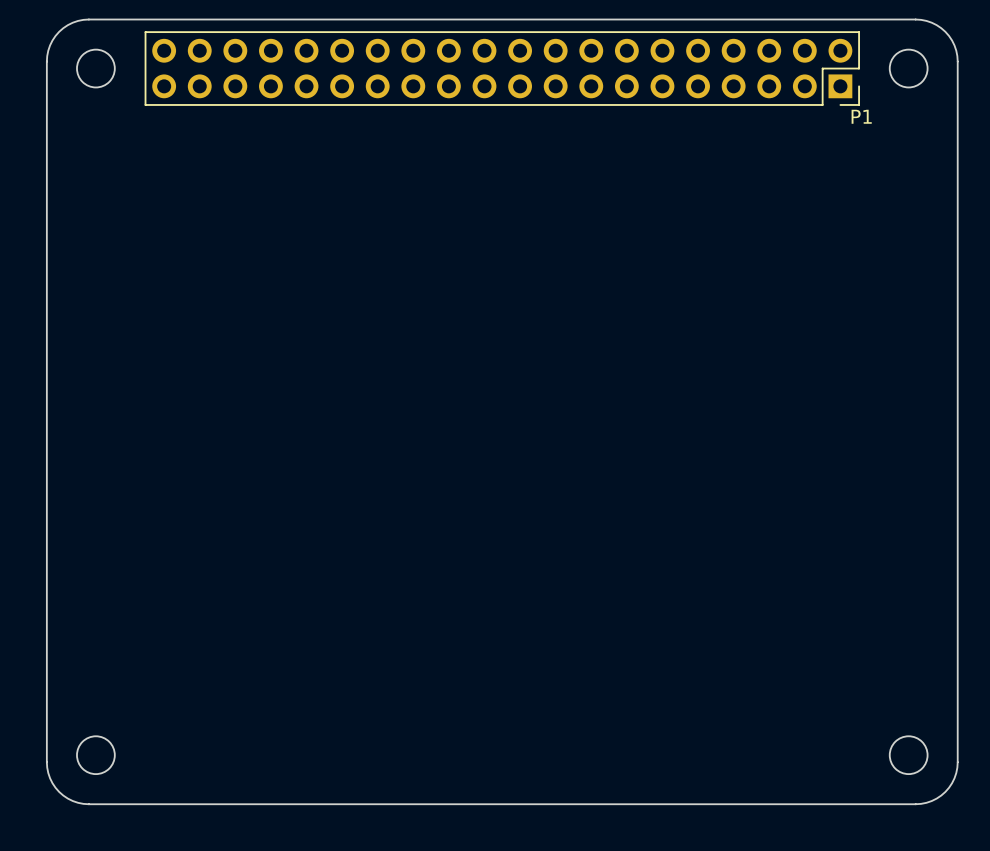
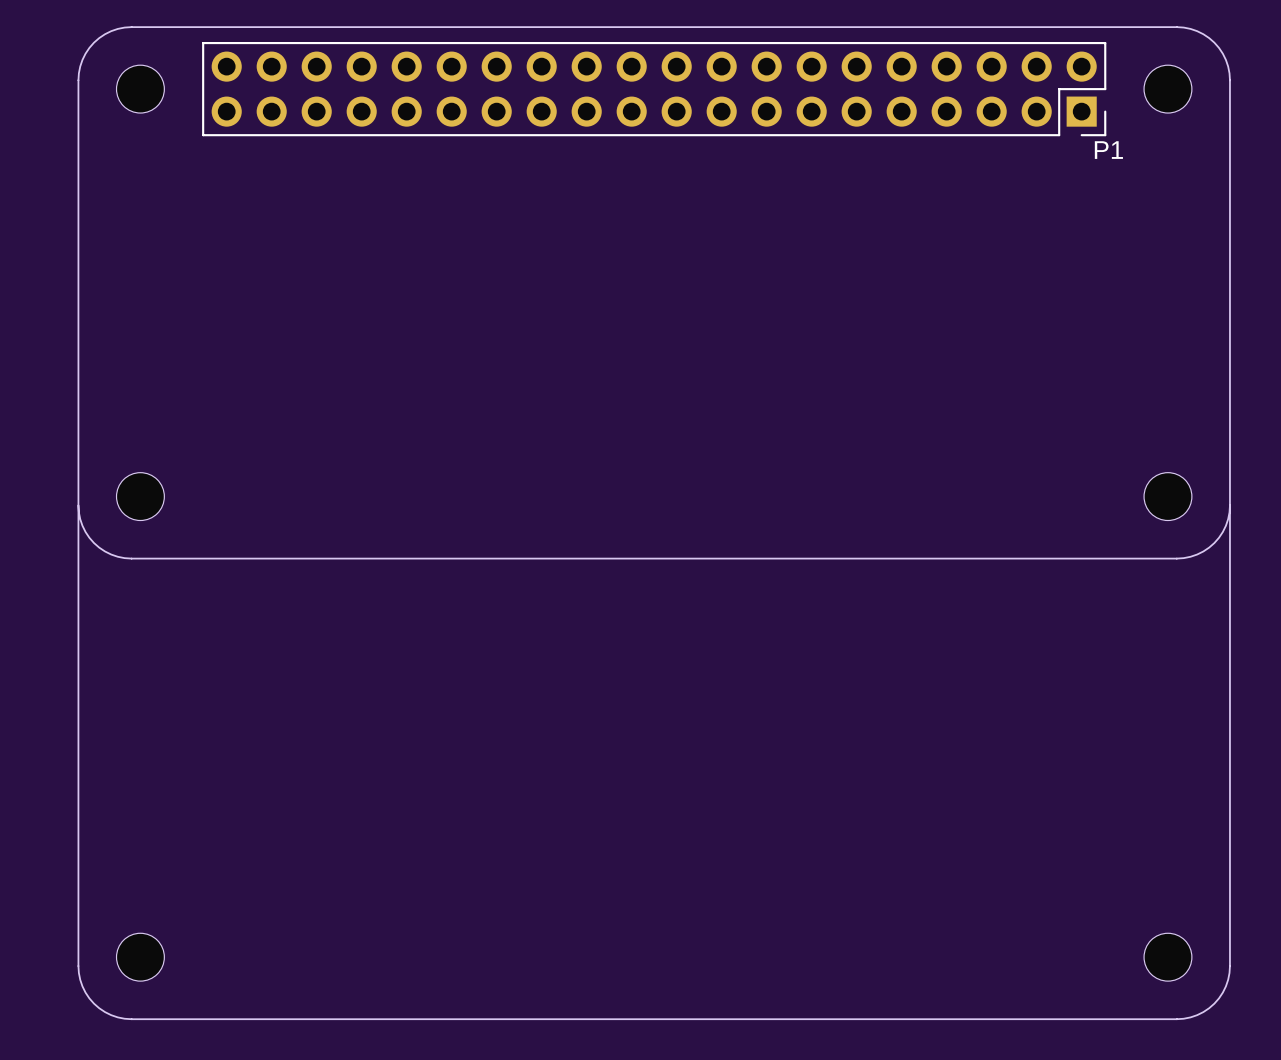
part: none -> (140, 496)
part: none -> (1167, 496)
board edge: none -> (1229, 505) (1225, 525) (1214, 543) (1197, 554) (1176, 558) (131, 558) (111, 554) (94, 543) (82, 525) (78, 505)

